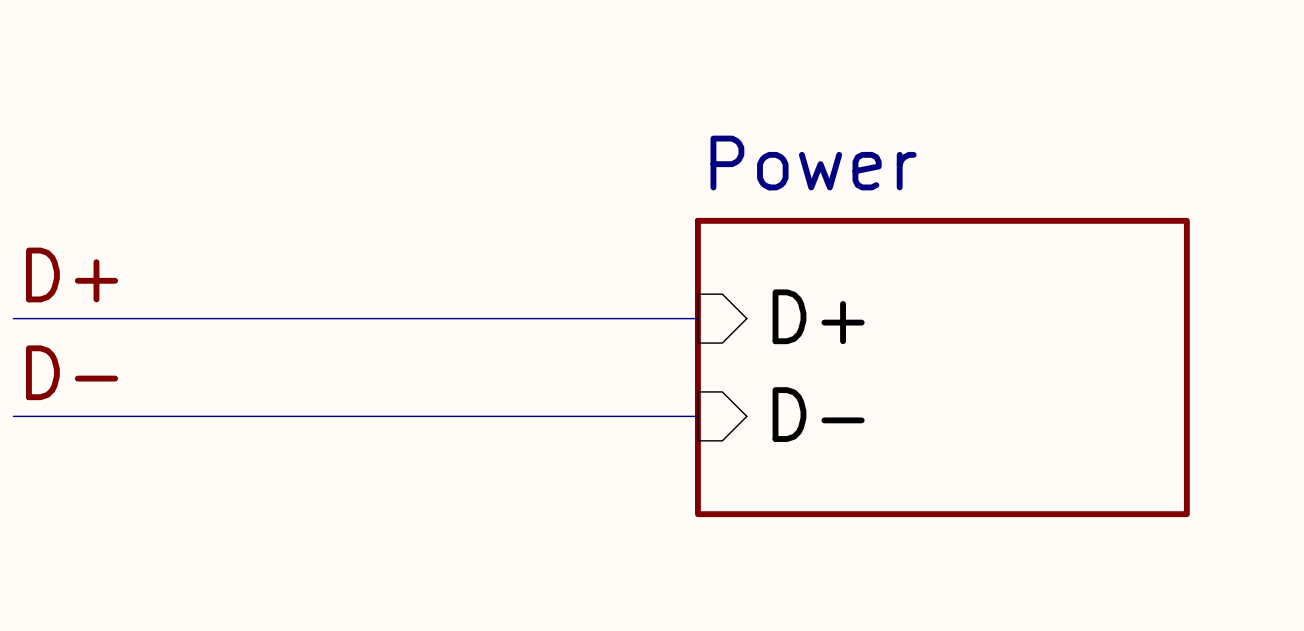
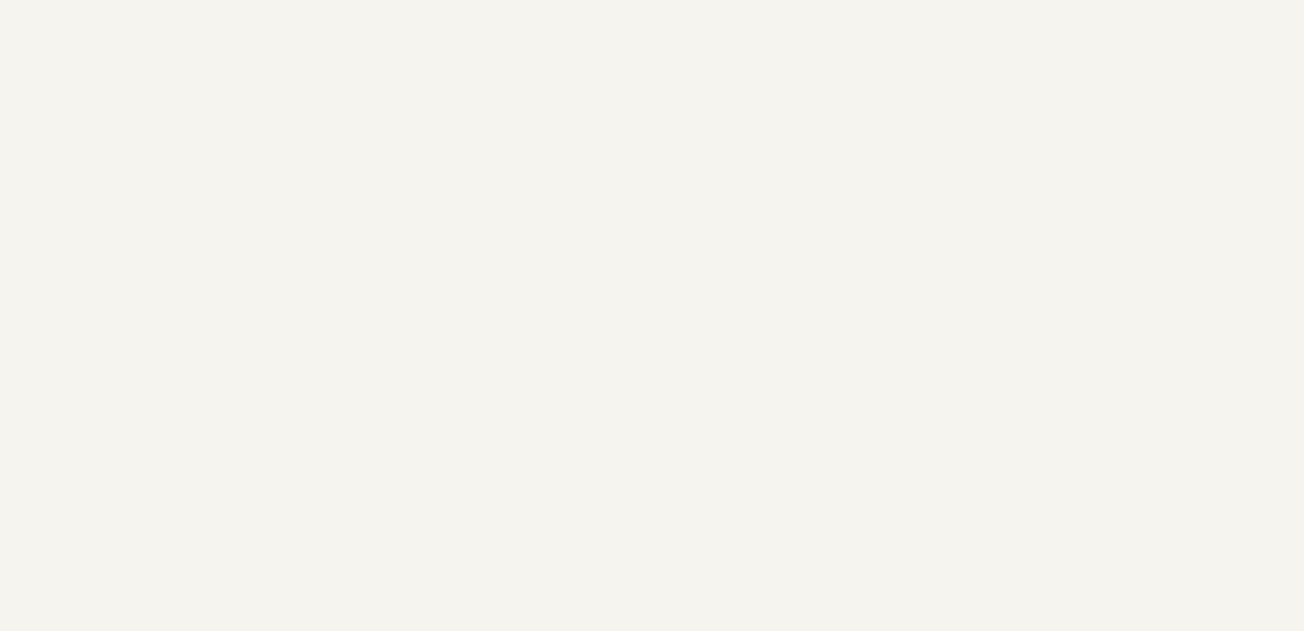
label: D+ (72, 274) -> none
sheet pin: D+ (818, 316) -> none
wire: (13, 318) (697, 318) -> none
sheet Power: (942, 367) -> none
label: D- (72, 372) -> none
sheet pin: D- (818, 414) -> none
wire: (13, 416) (697, 416) -> none

